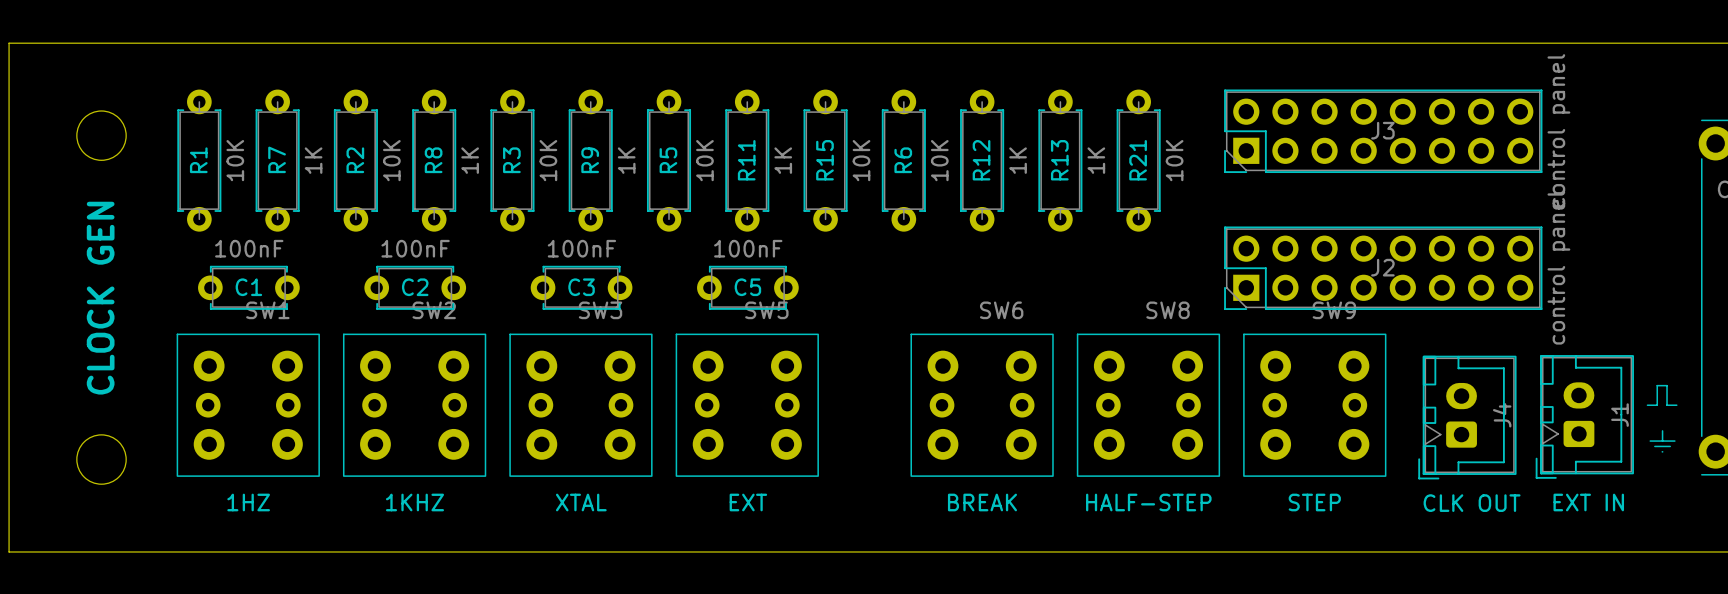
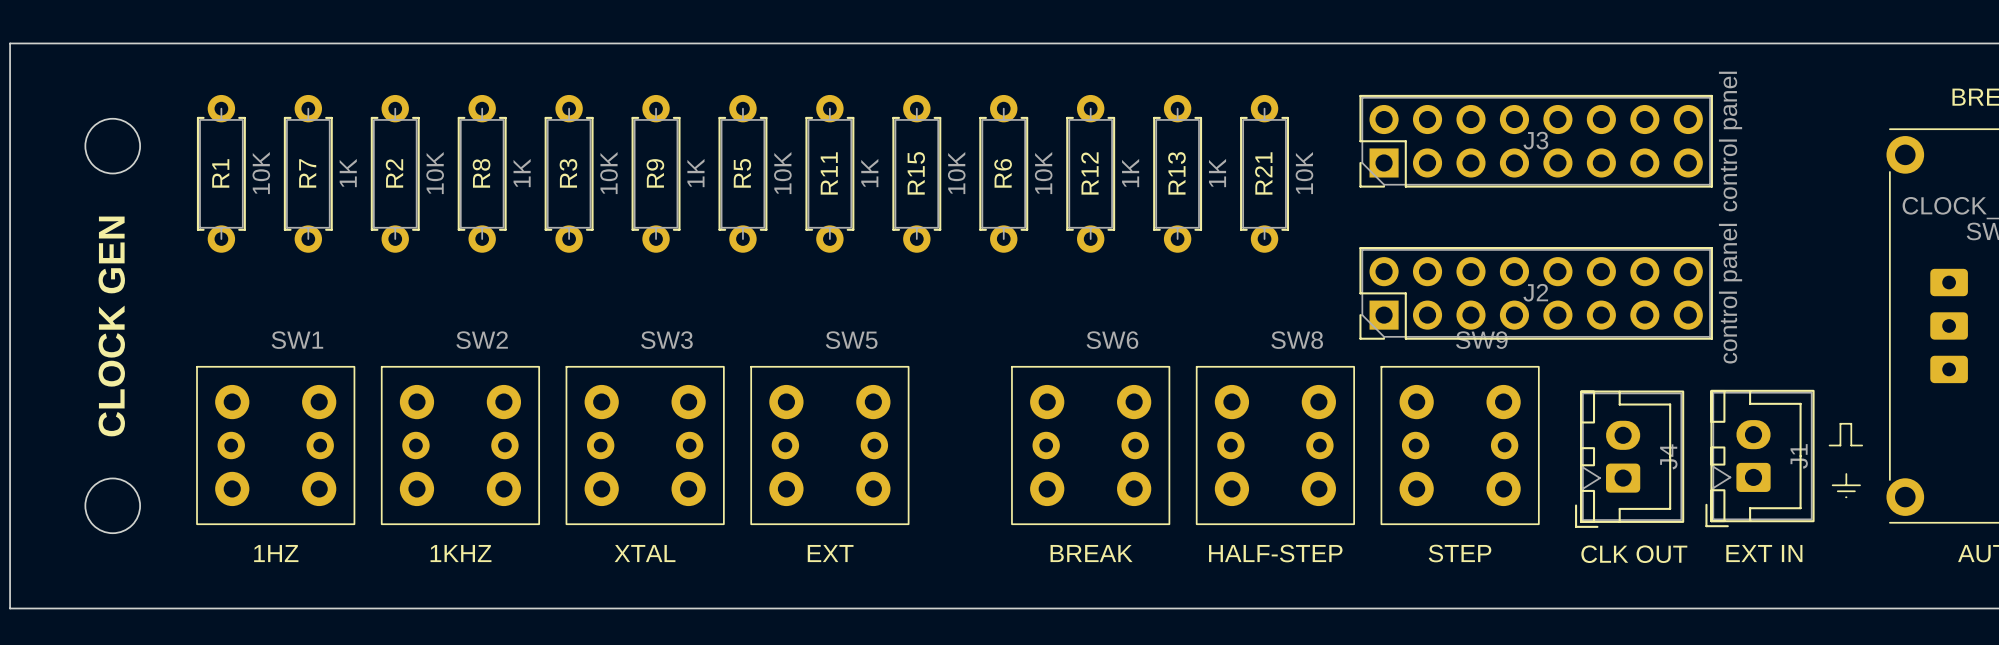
C1: 100nF (248, 287) -> none
C2: 100nF (415, 287) -> none
C3: 100nF (581, 287) -> none
C5: 100nF (747, 287) -> none

